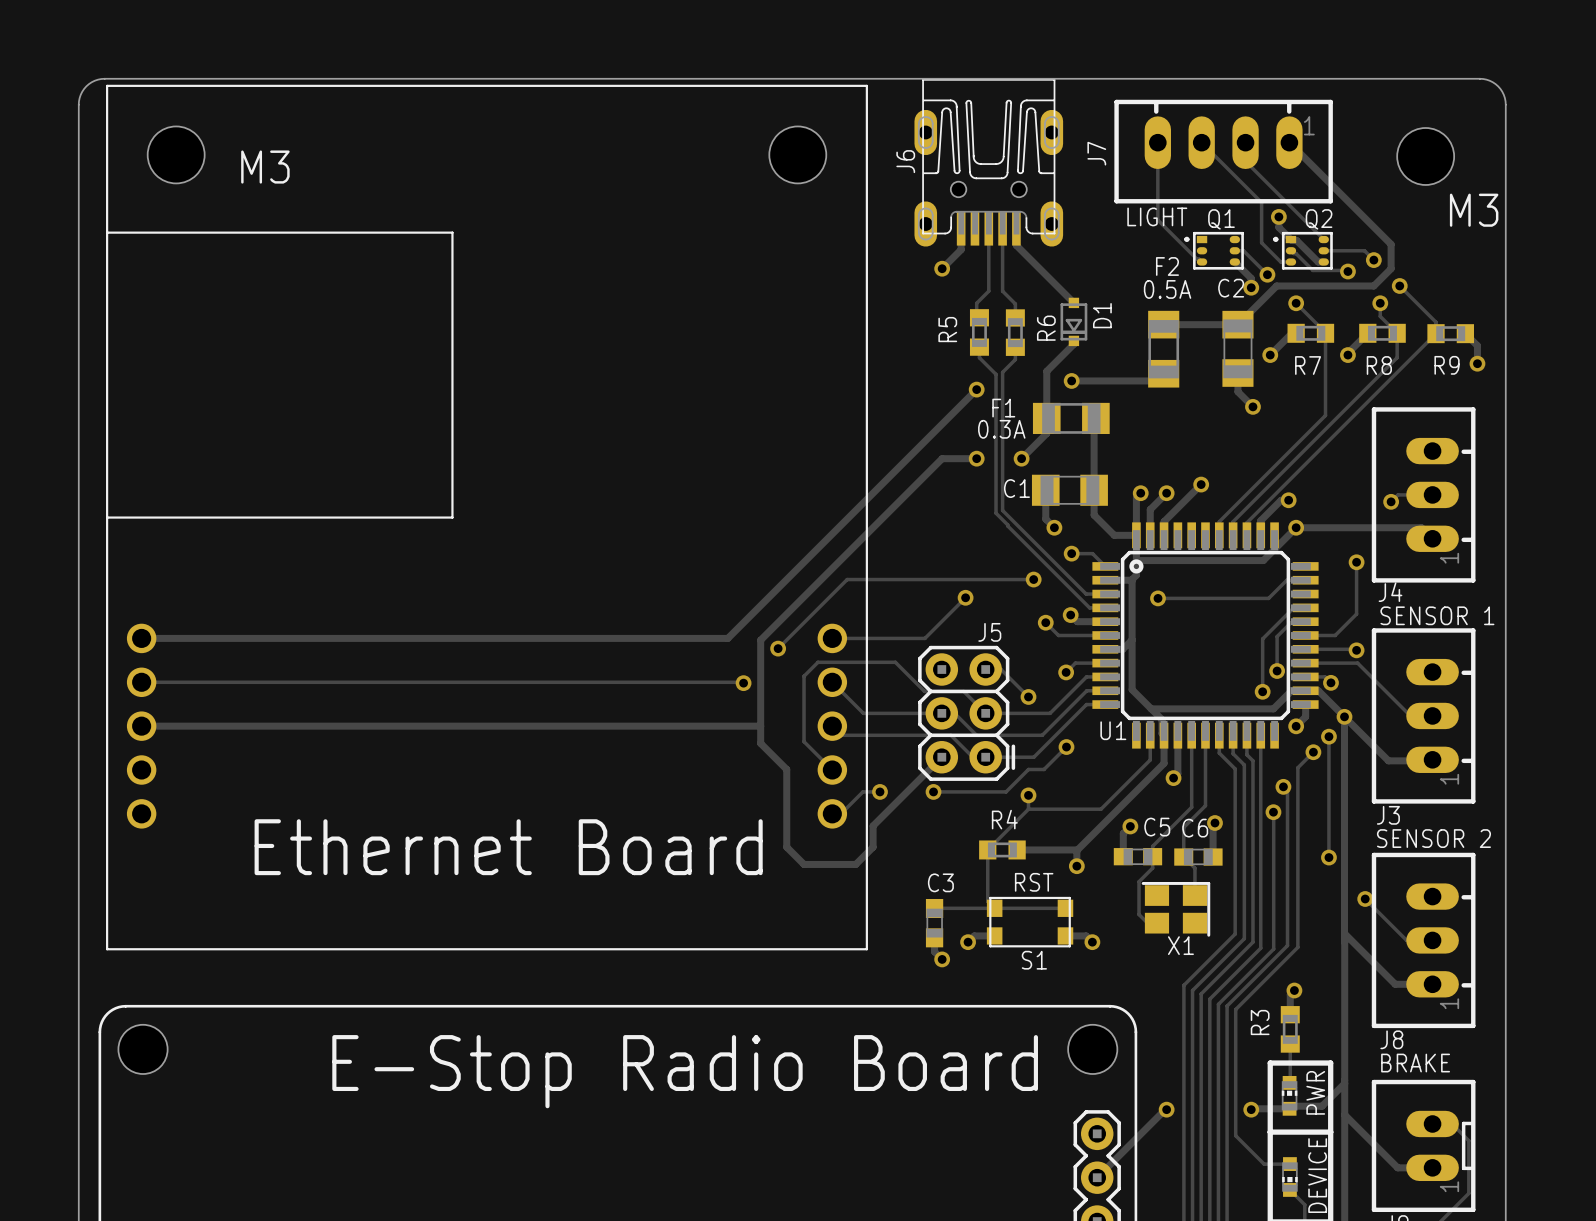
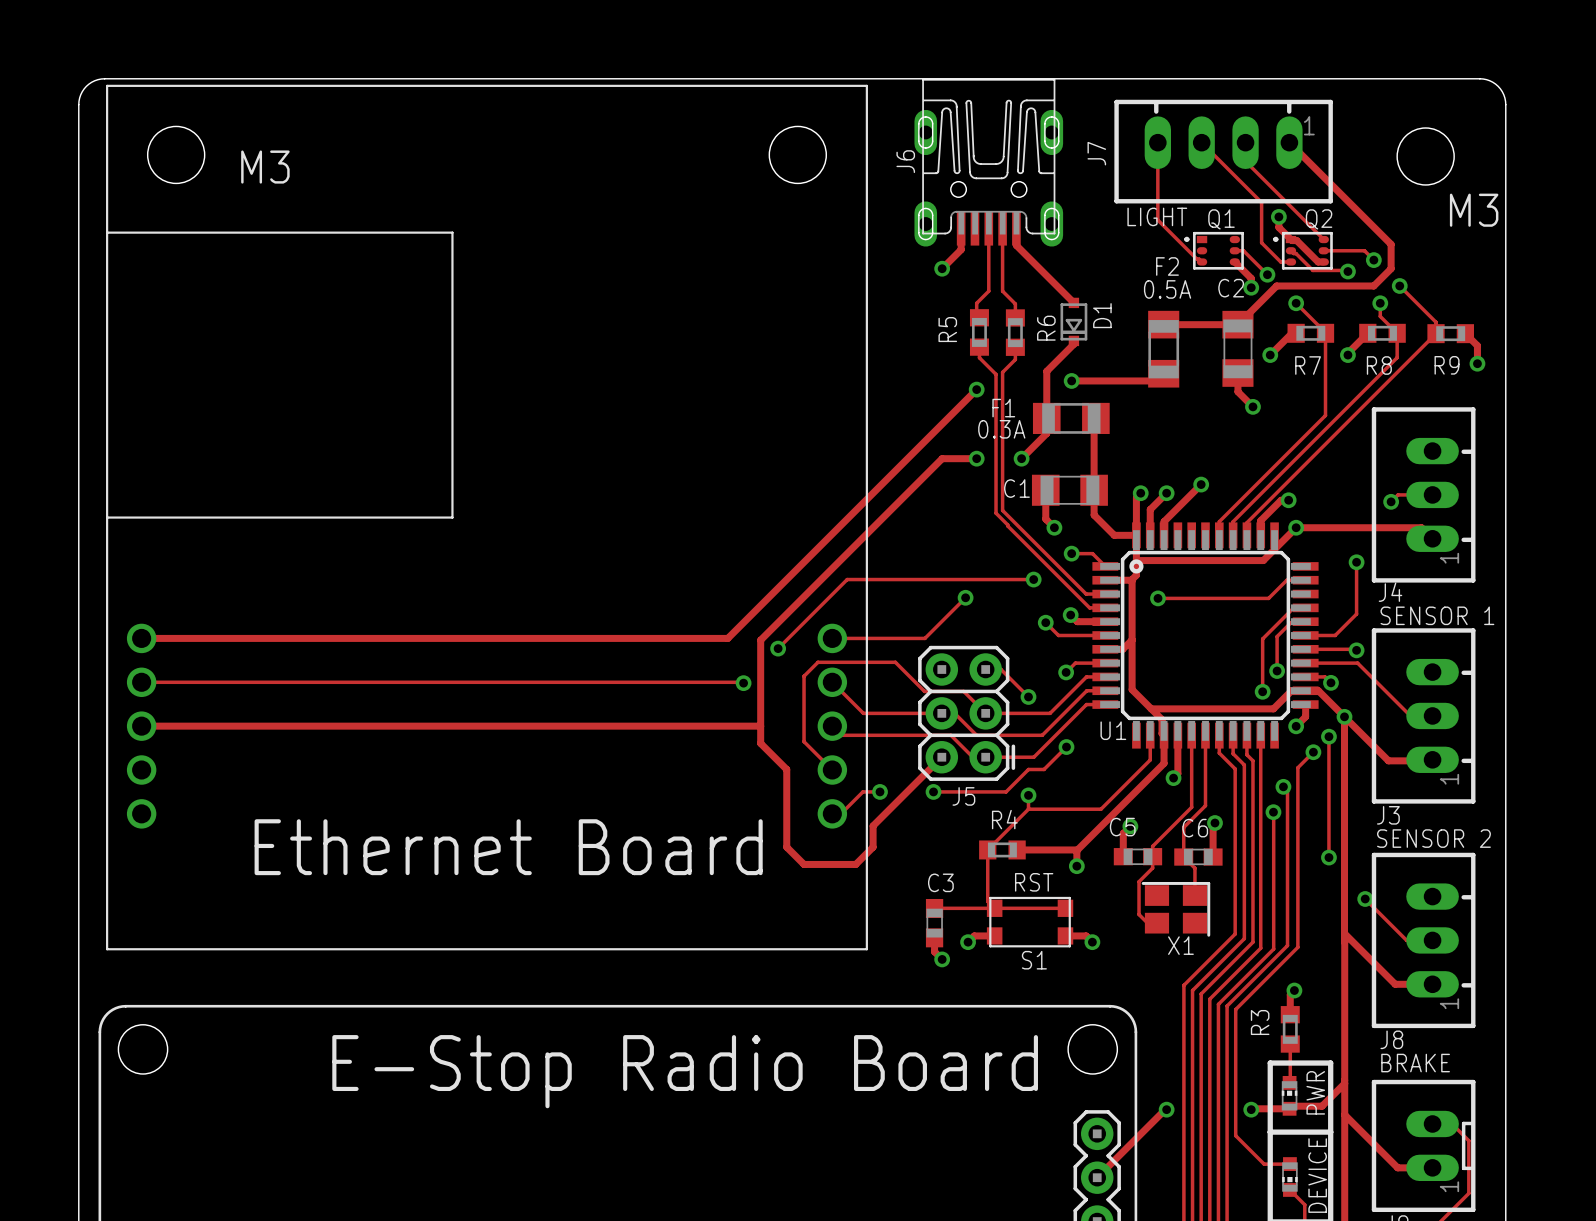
J5 name position: J5 (989, 632) -> J5 (963, 796)
C5 name position: C5 (1157, 827) -> C5 (1122, 827)

